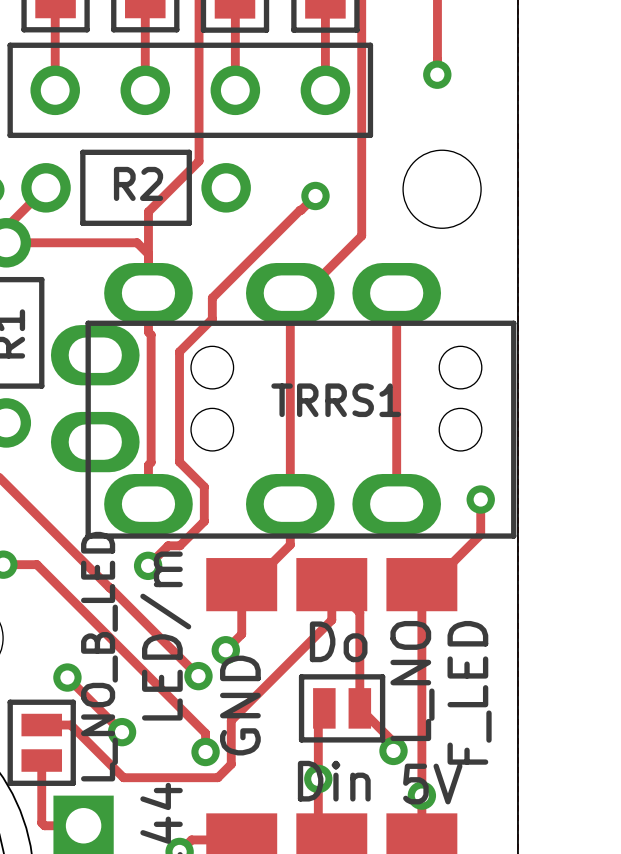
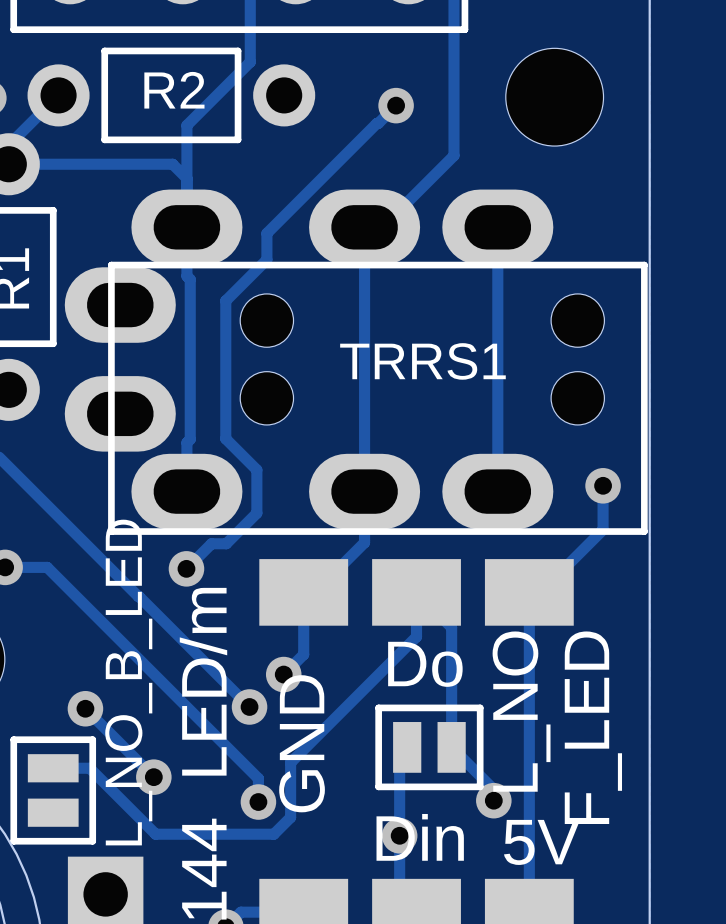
track: (41, 760) (41, 822) (44, 825) (83, 825) -> none
via: (421, 795) -> none

